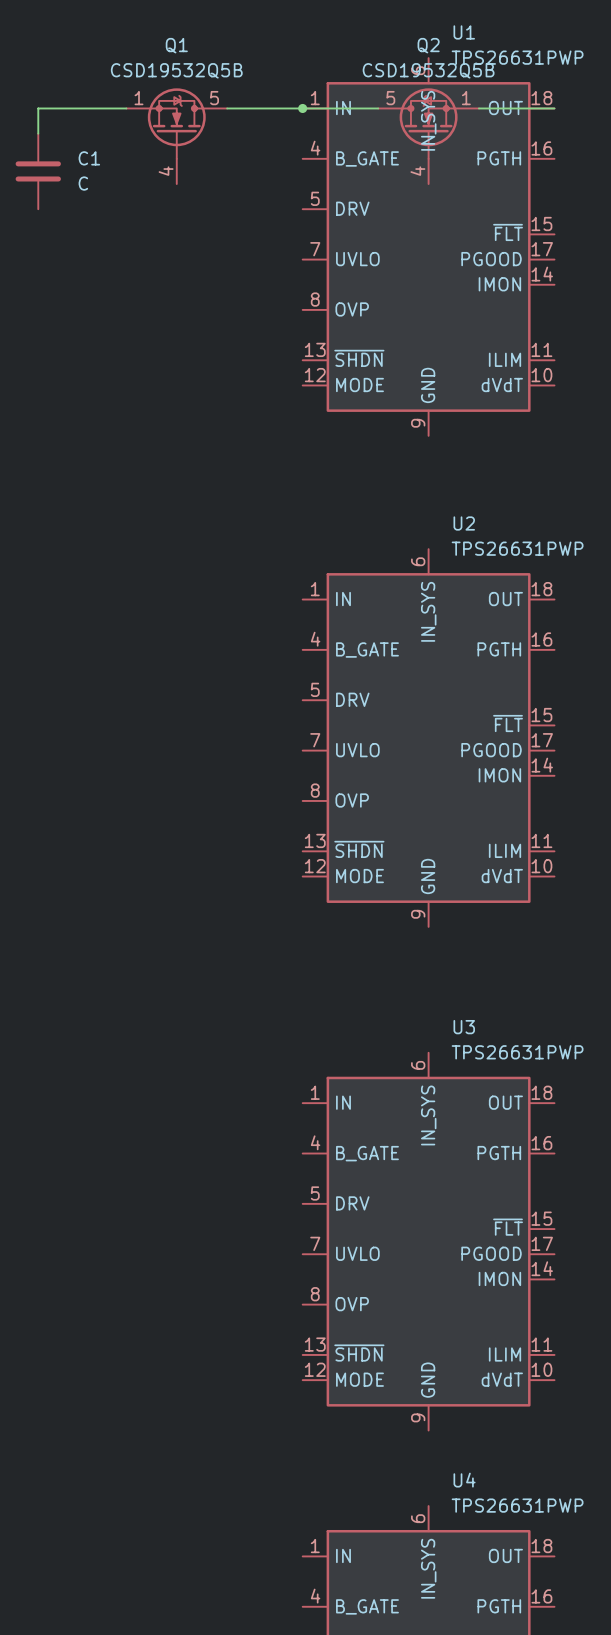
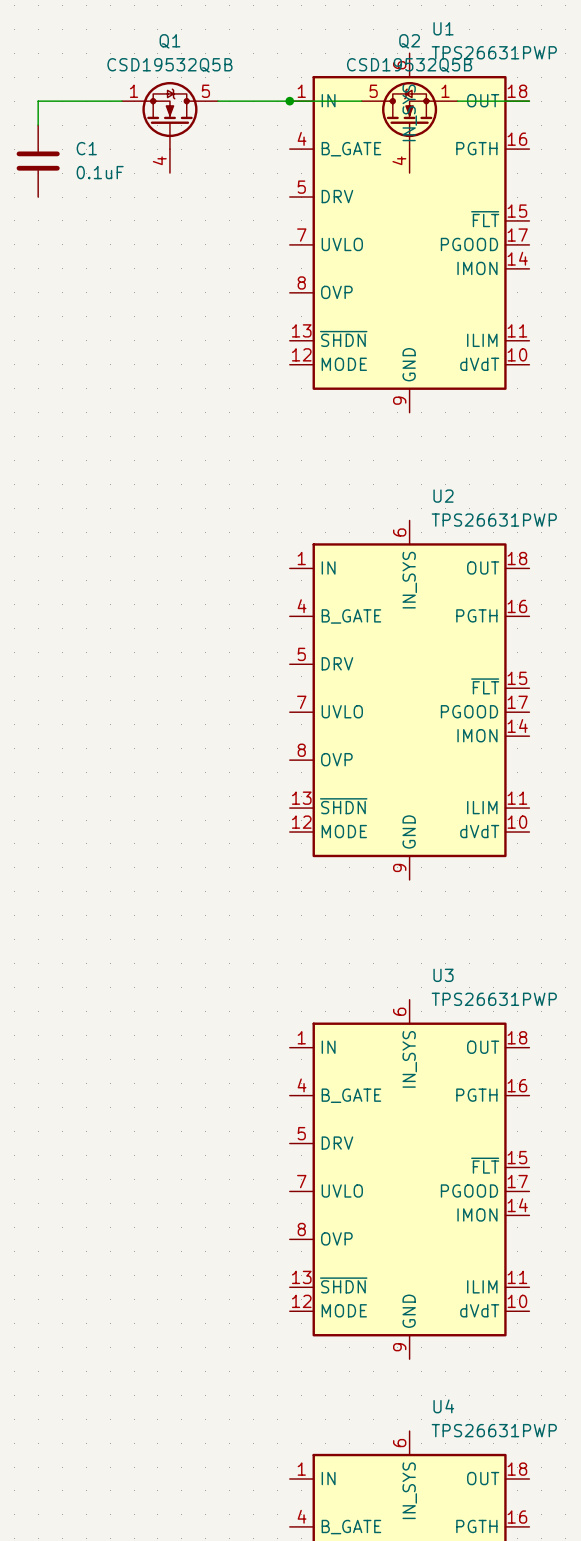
C1 value: C (83, 183) -> 0.1uF (100, 172)

